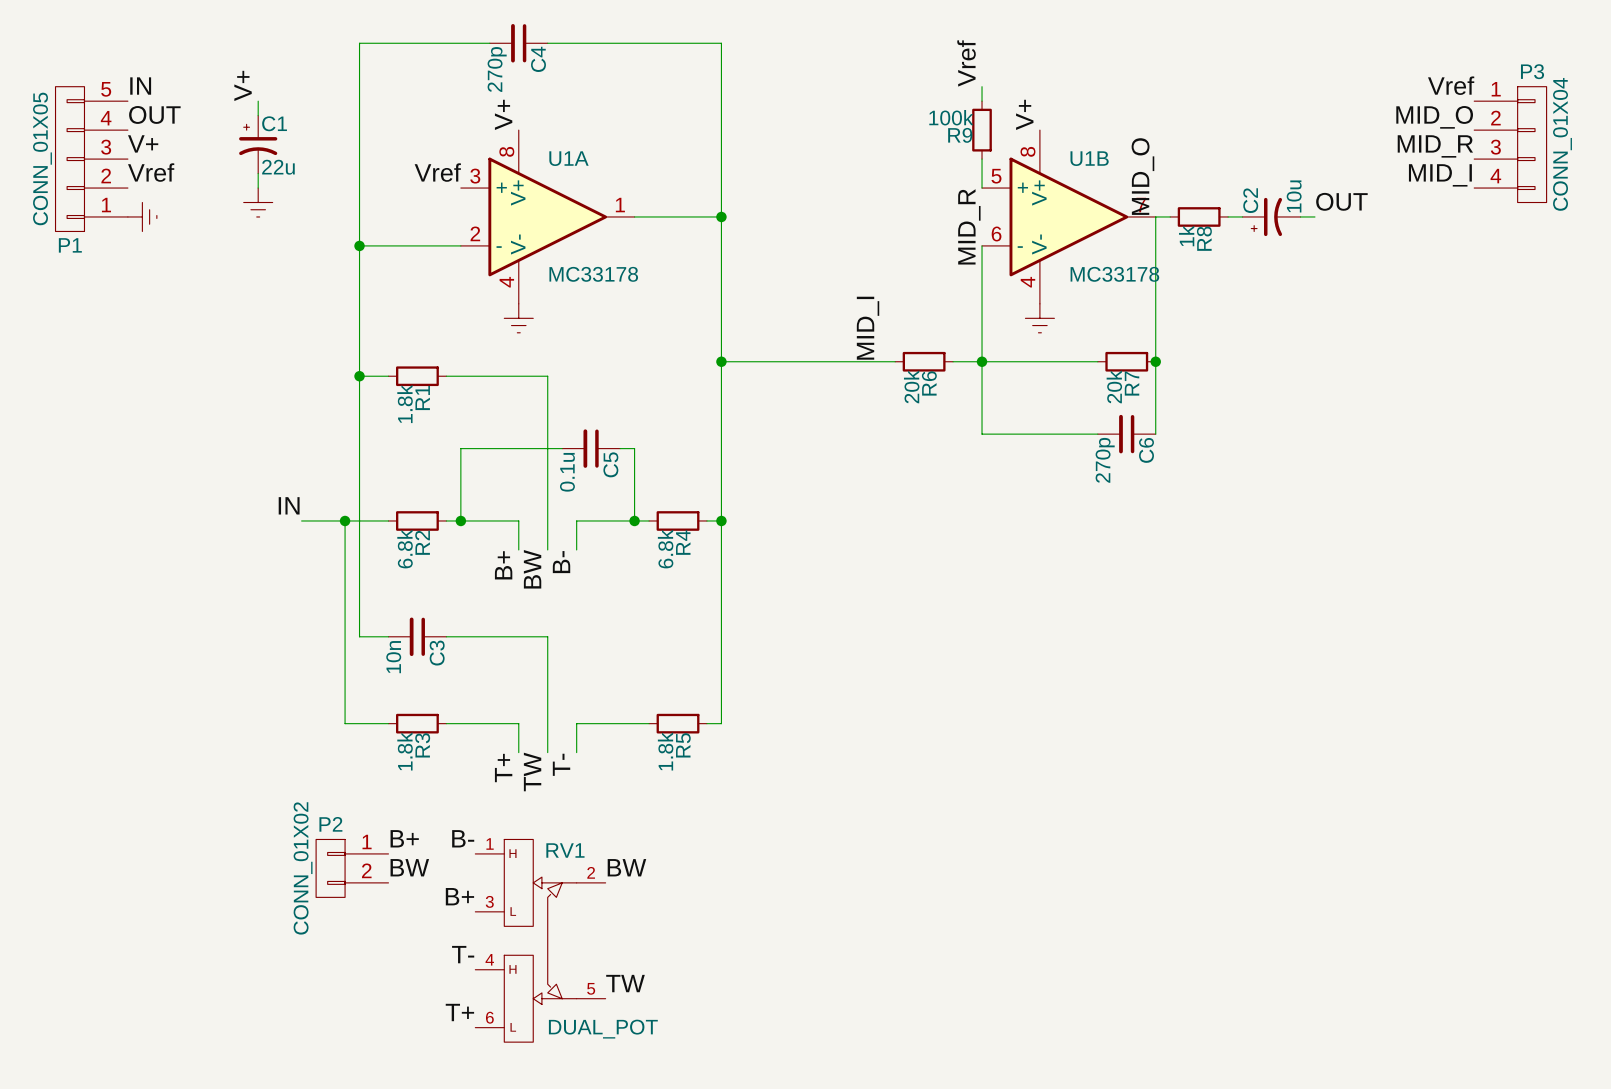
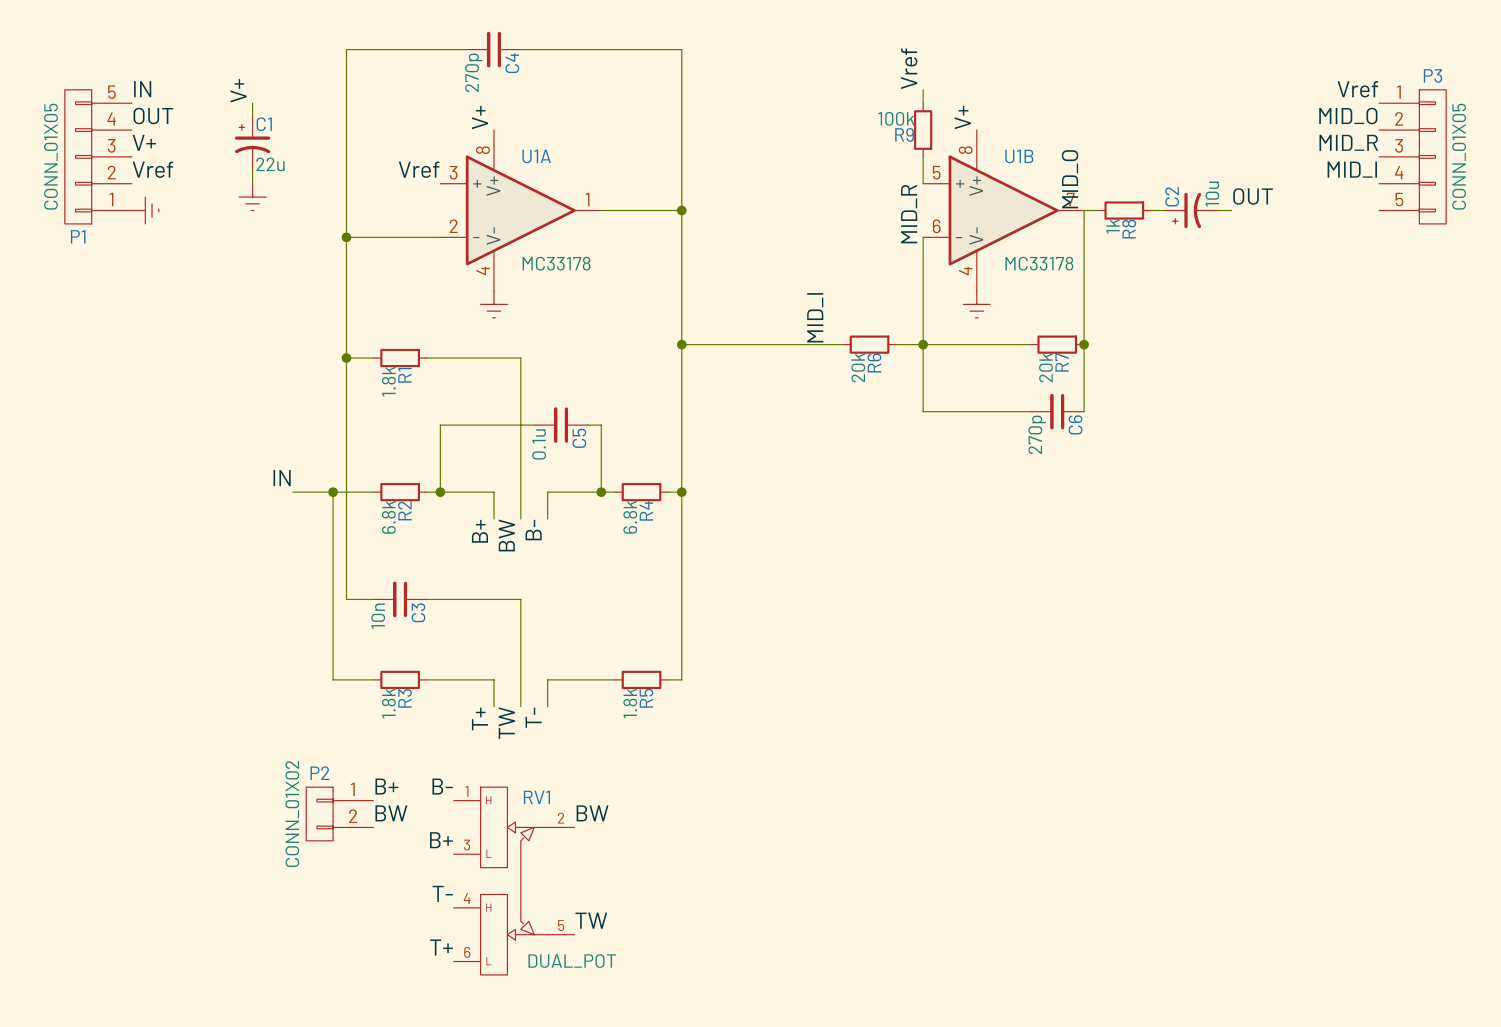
P3 symbol: [1474, 86, 1547, 203] -> [1379, 89, 1447, 224]
P3 value: CONN_01X04 (1562, 144) -> CONN_01X05 (1459, 156)

